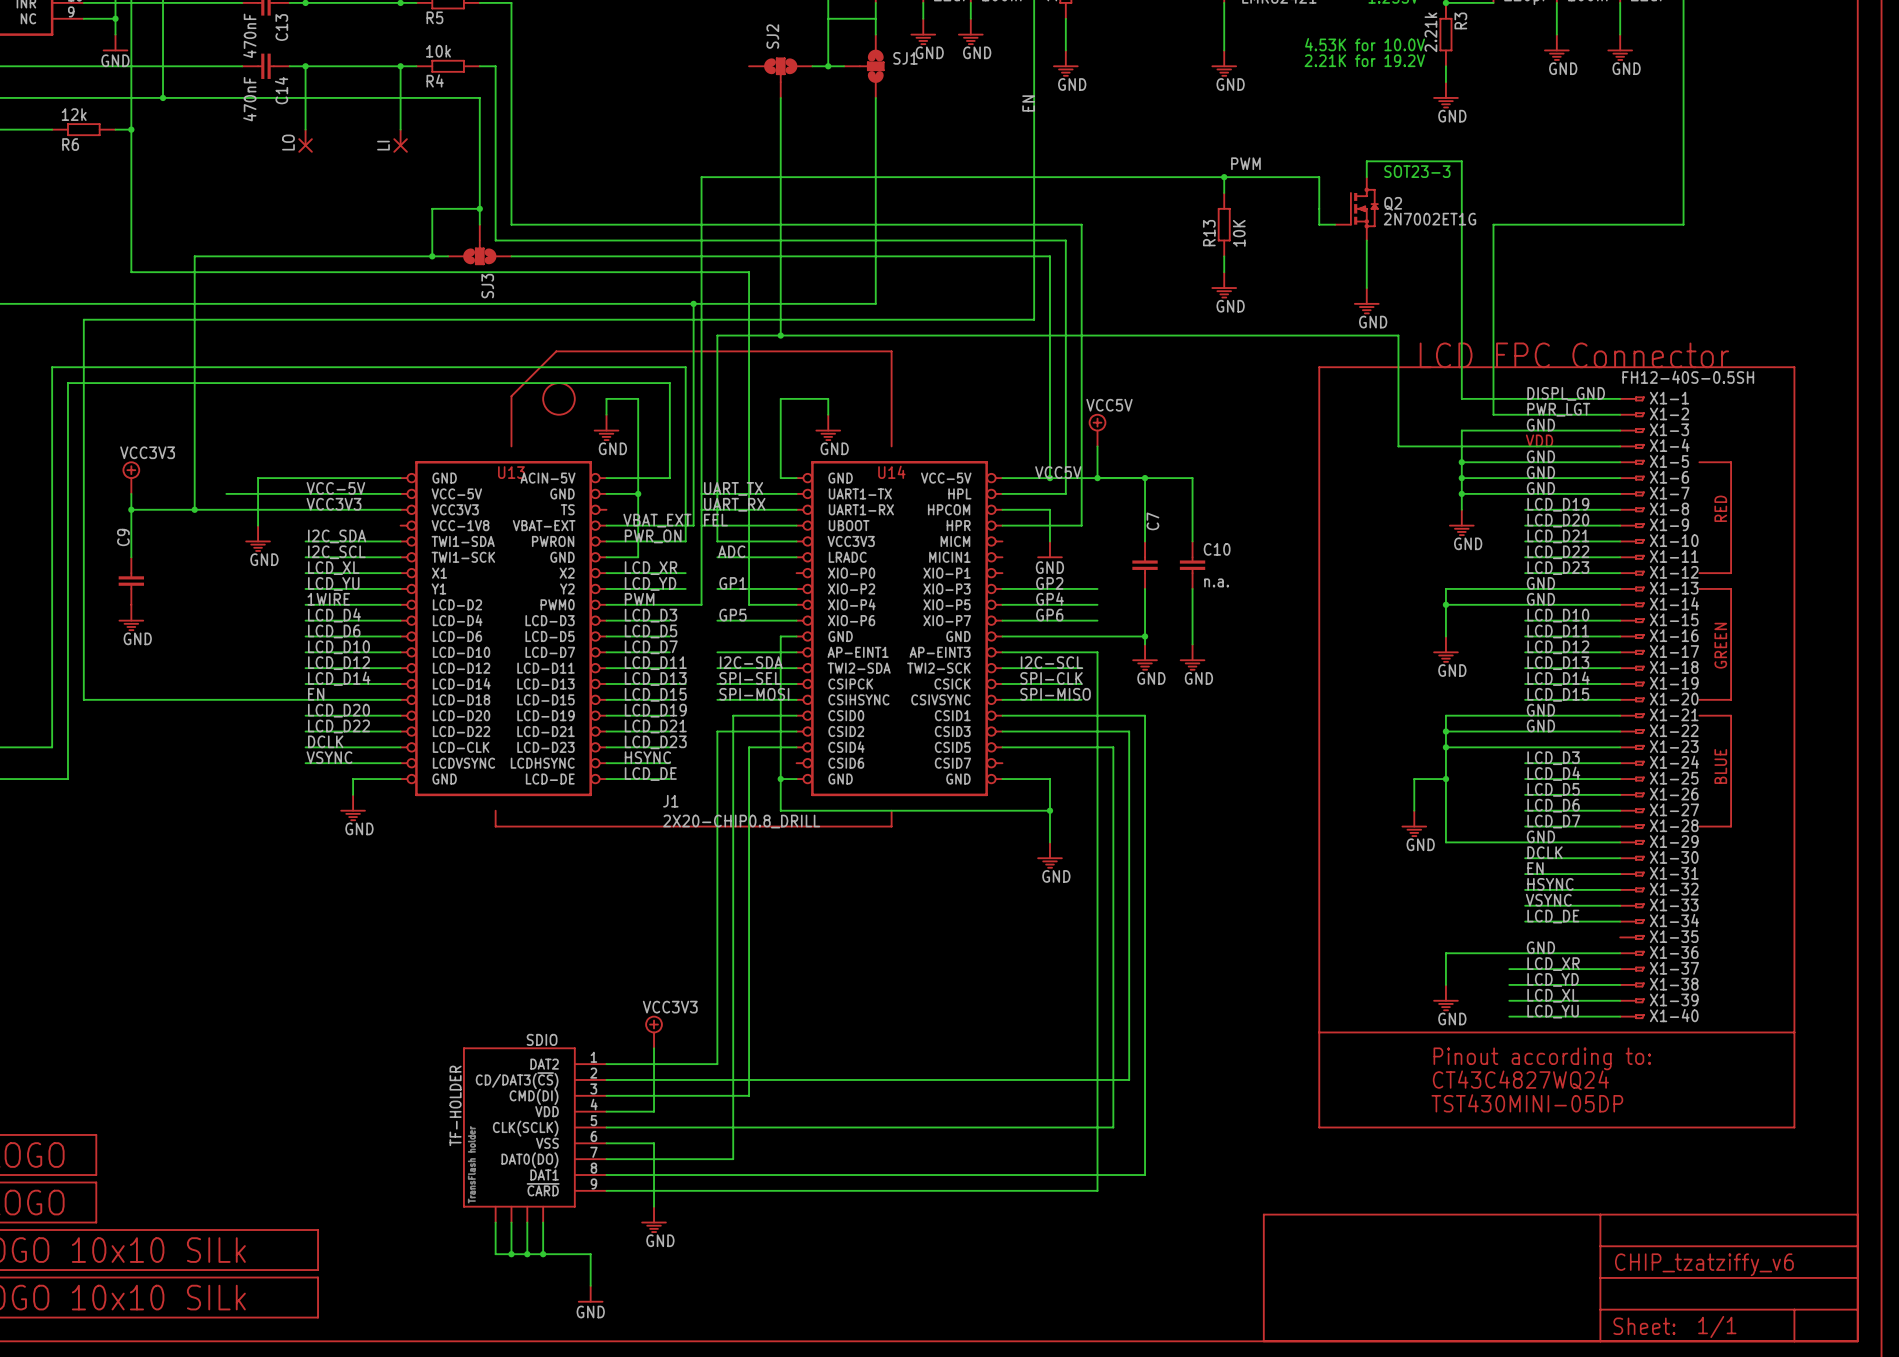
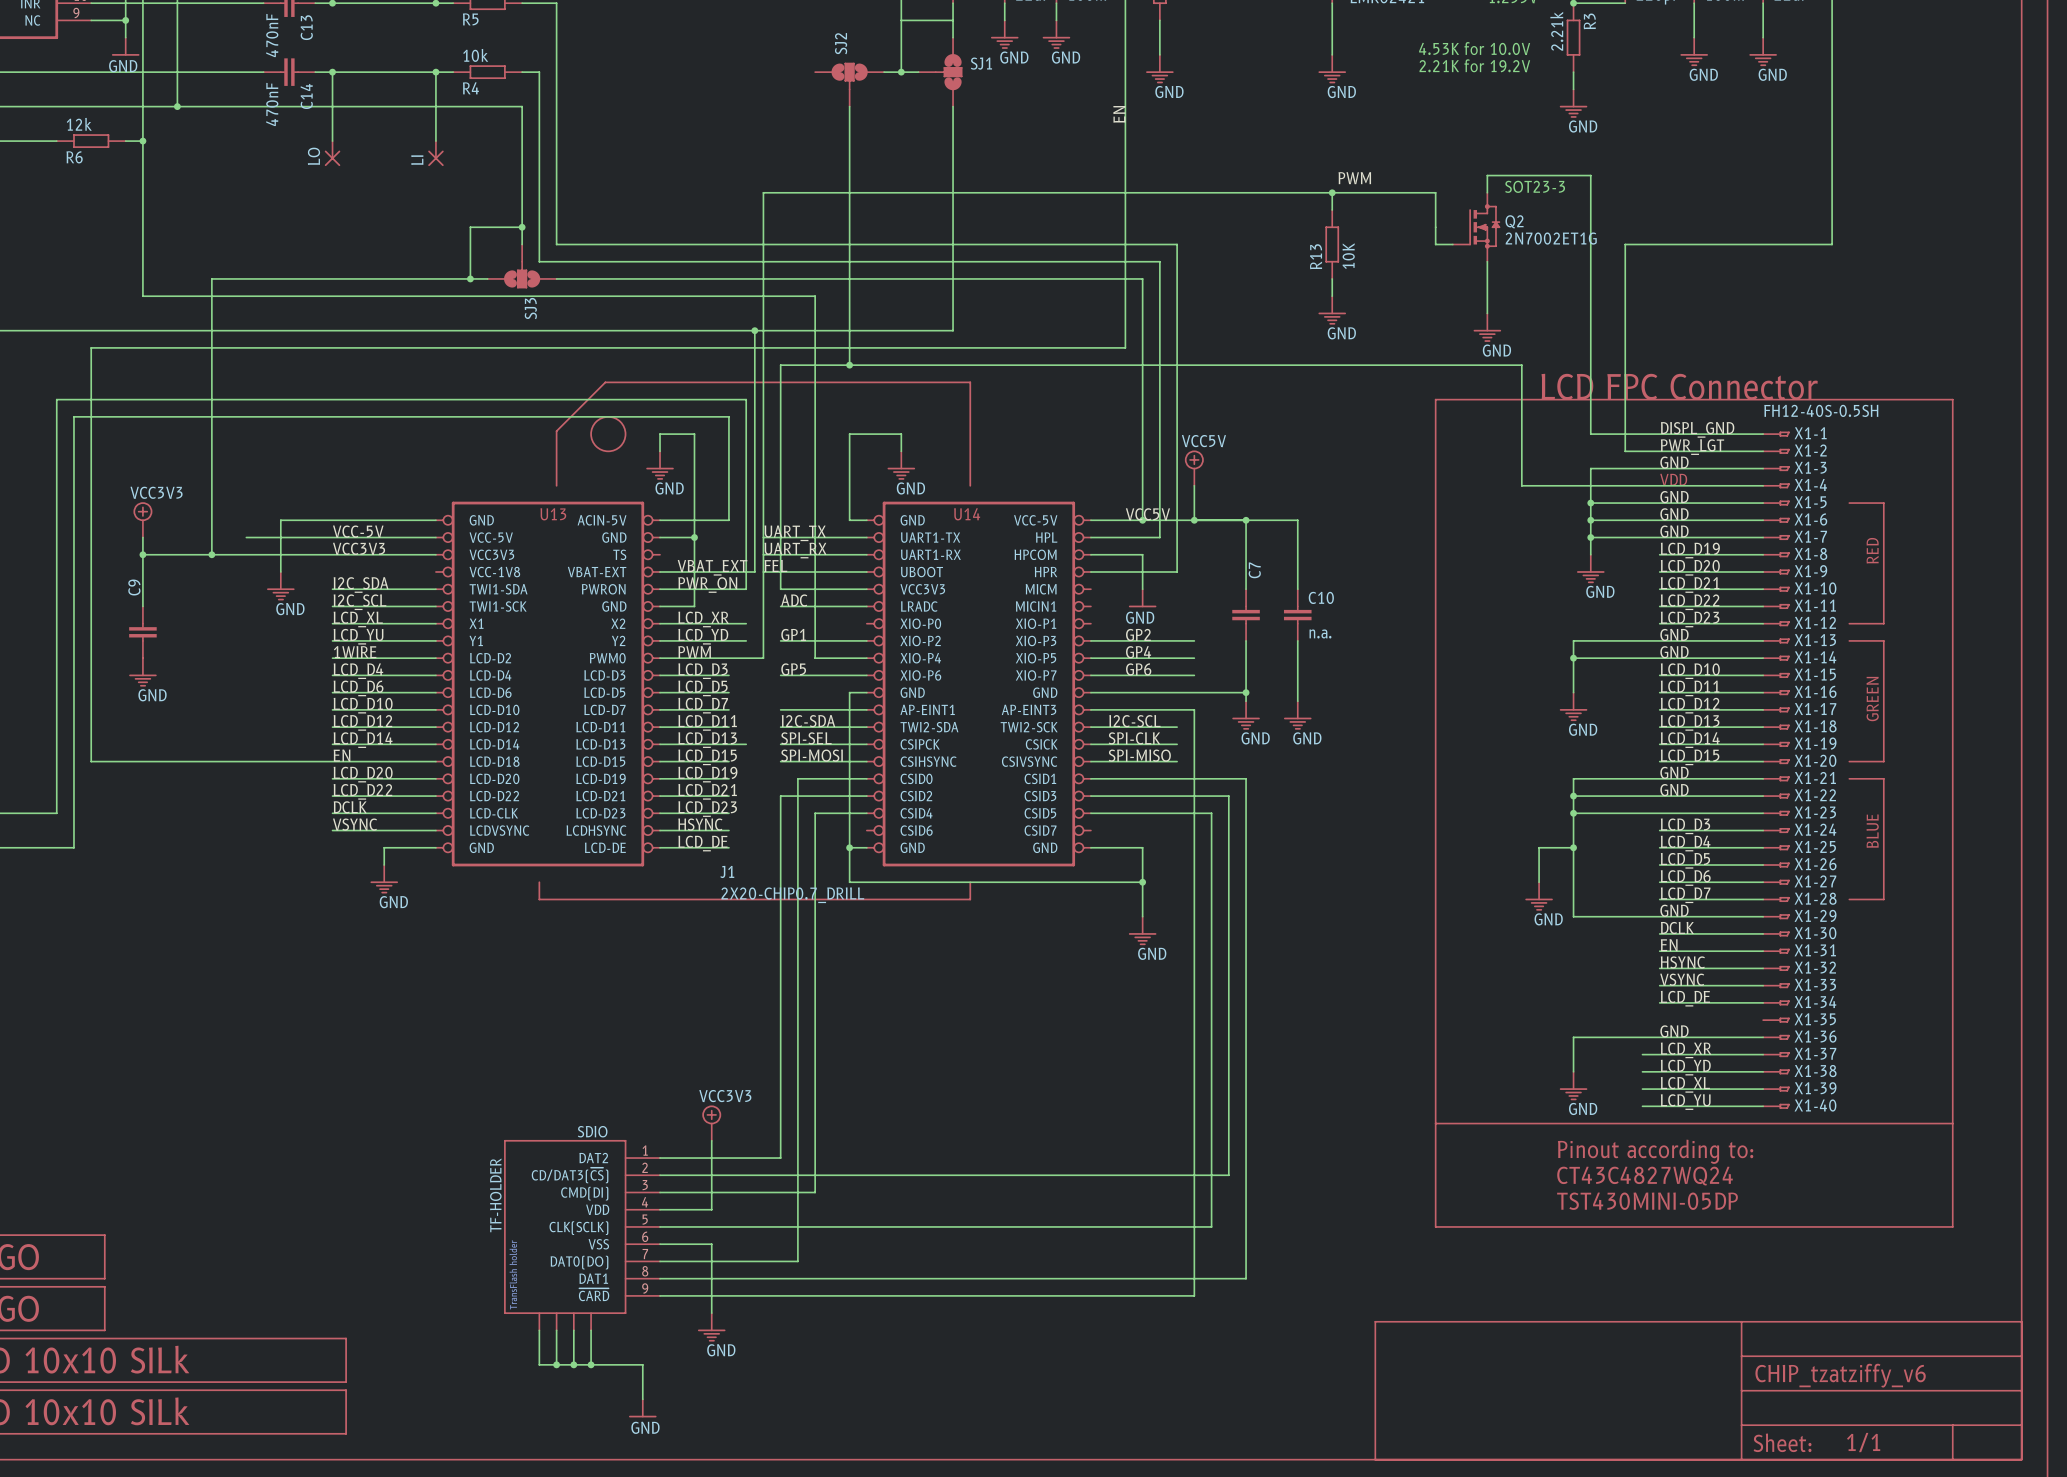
J1 value: 2X20-CHIP0.8_DRILL (741, 821) -> 2X20-CHIP0.7_DRILL (792, 895)

